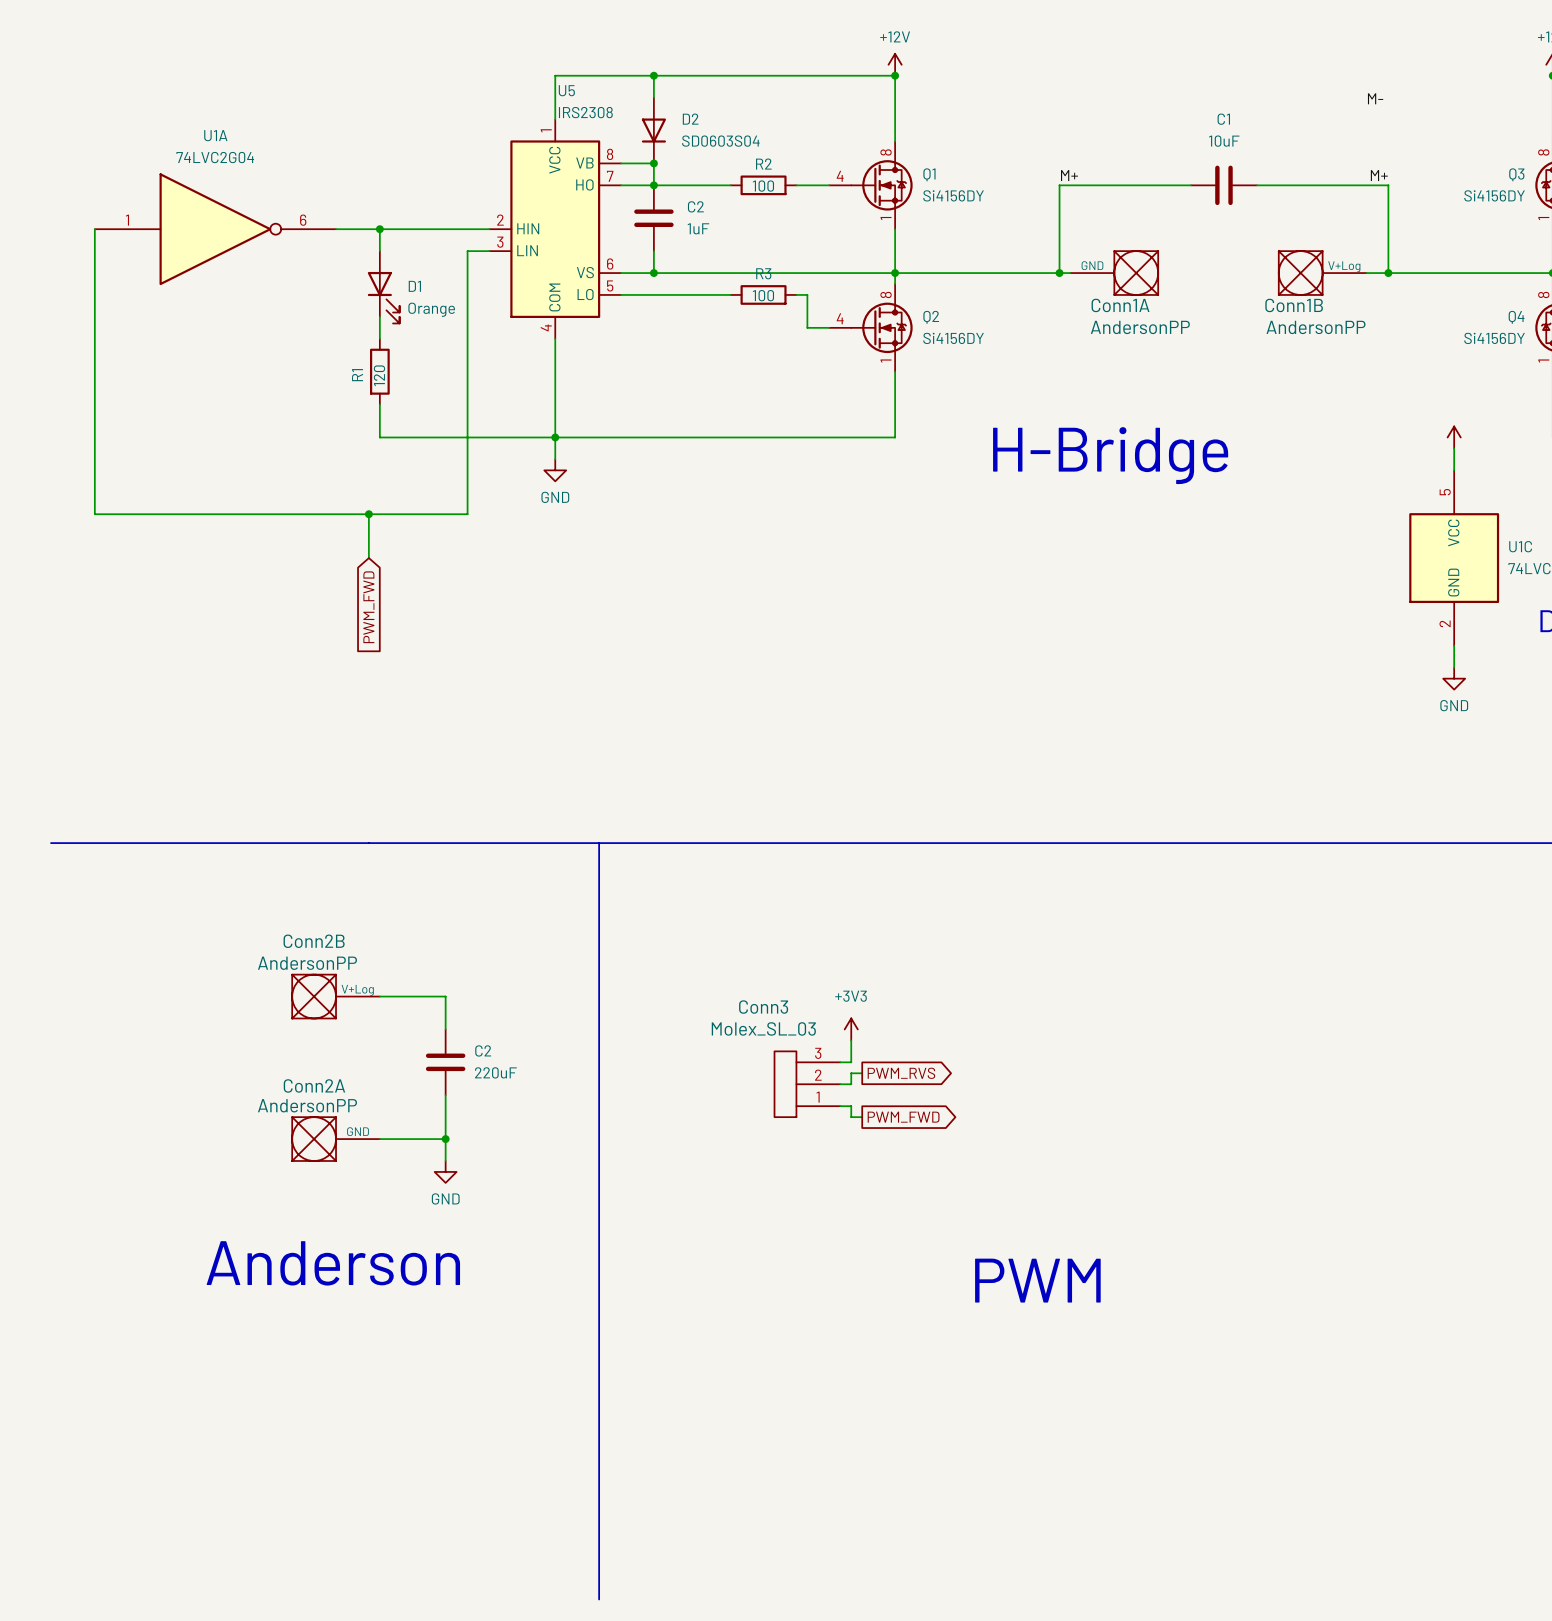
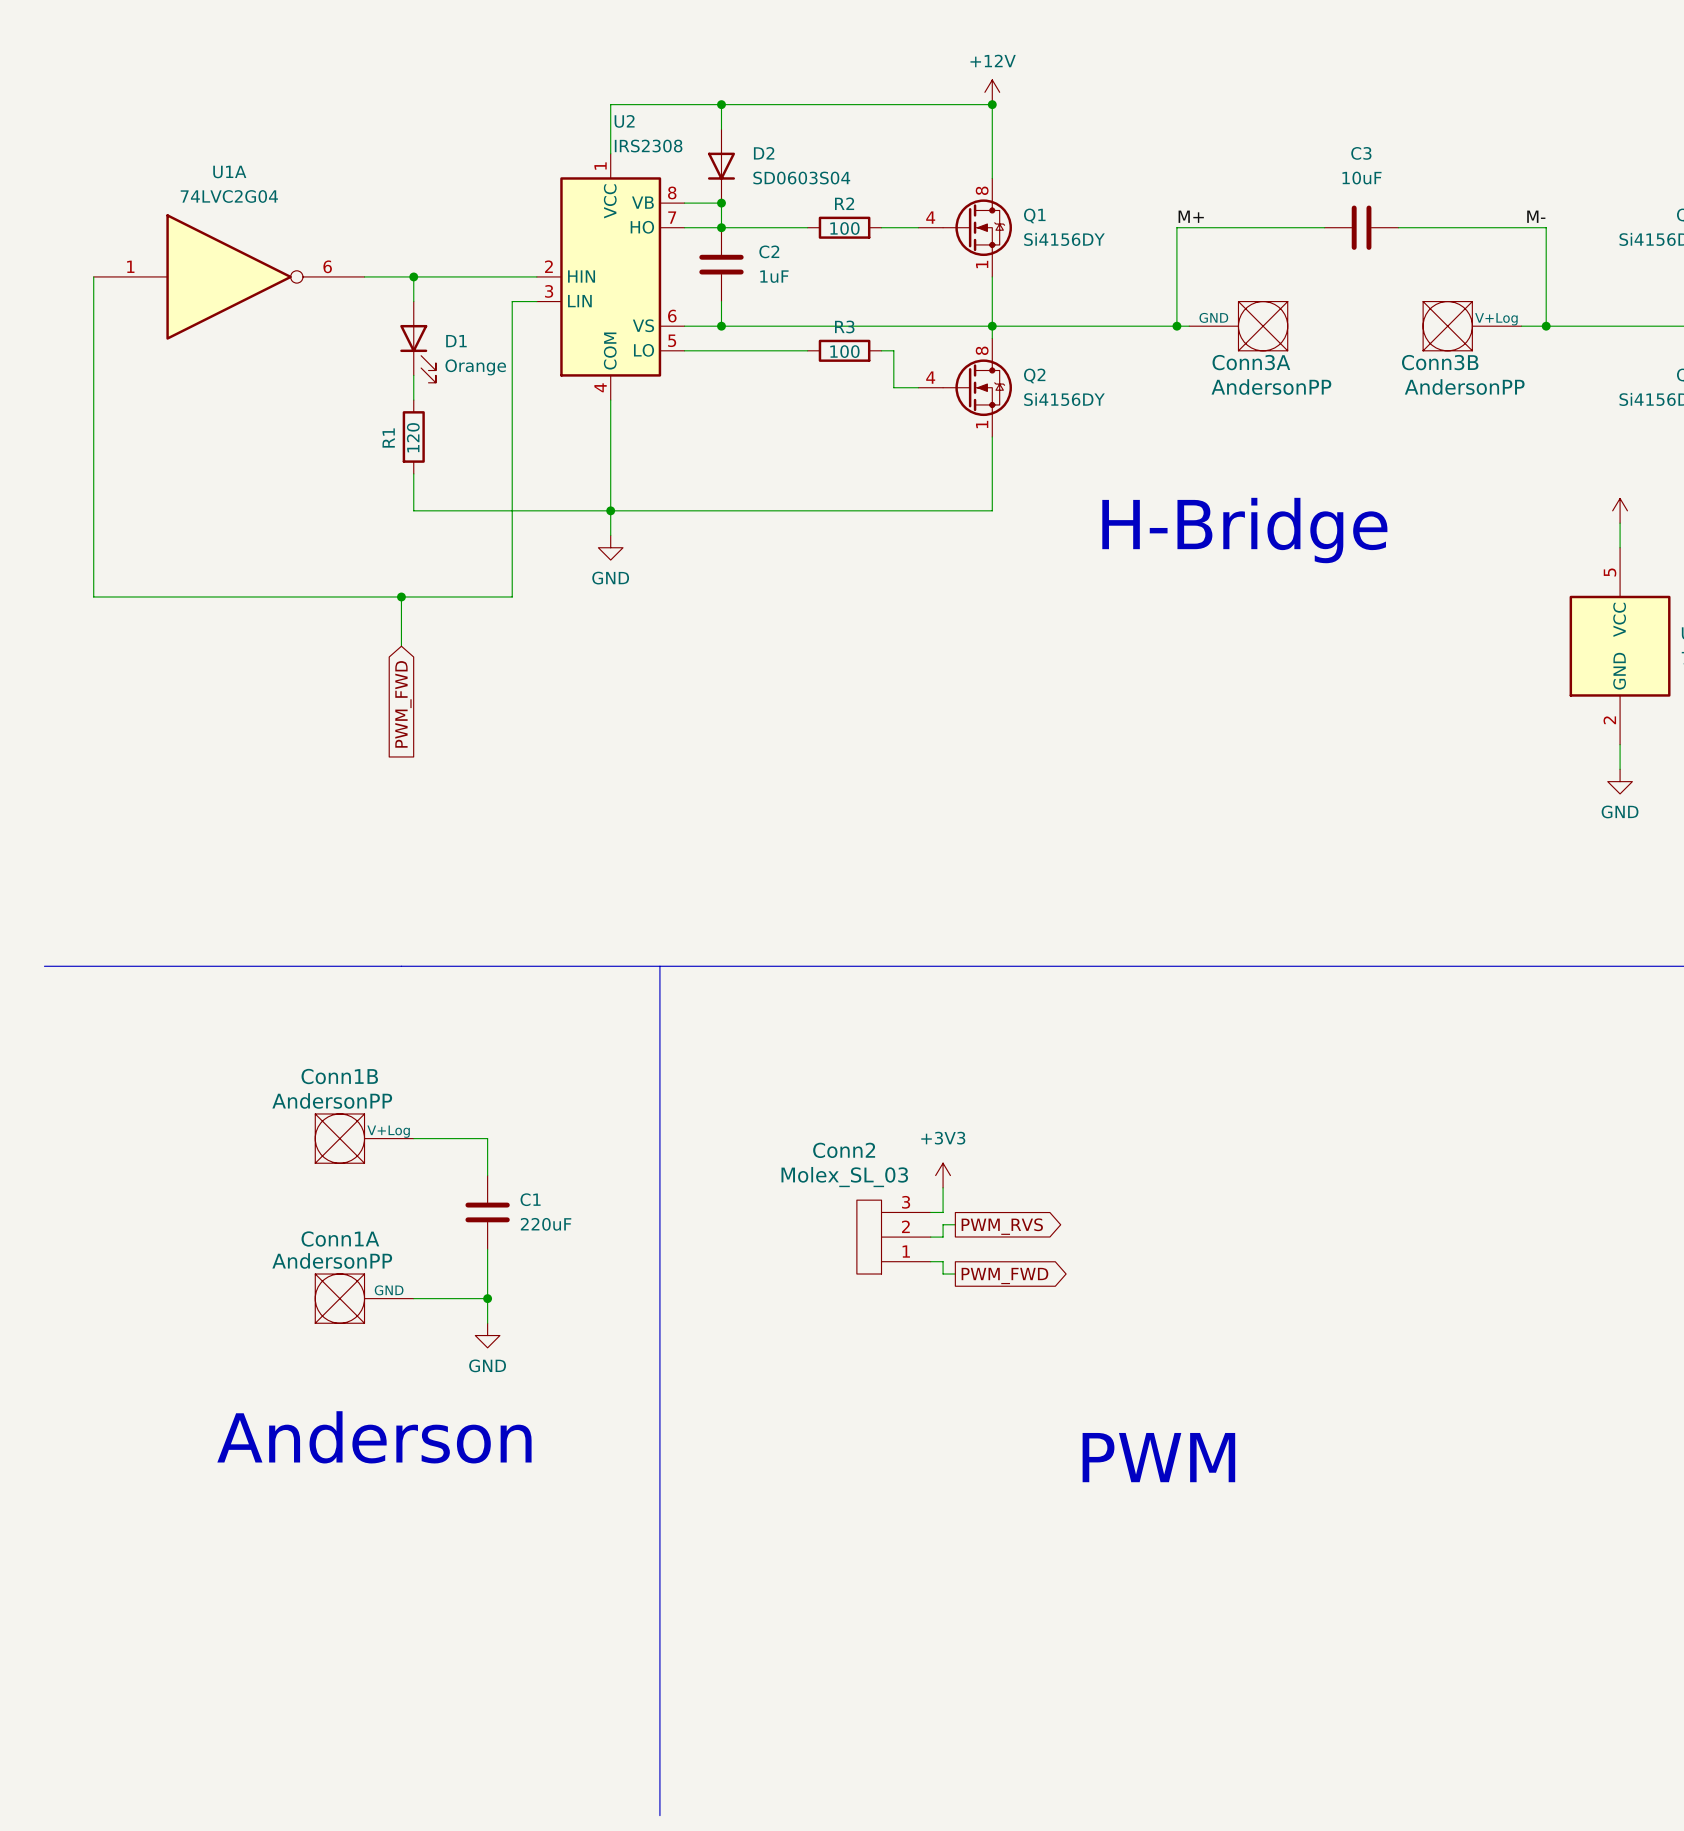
U5 name: U5 (566, 90) -> U2 (624, 121)
label: M- (1375, 98) -> none
C1 name: C1 (1223, 119) -> C3 (1361, 153)
label: M+ (1379, 175) -> M- (1536, 216)
Conn1A name: Conn1A (1120, 305) -> Conn3A (1251, 362)
Conn1B name: Conn1B (1294, 305) -> Conn3B (1440, 362)
Conn2B name: Conn2B (314, 941) -> Conn1B (339, 1076)
Conn3 name: Conn3 (763, 1007) -> Conn2 (844, 1150)
C2 name: C2 (483, 1050) -> C1 (530, 1199)
Conn2A name: Conn2A (314, 1085) -> Conn1A (340, 1239)

